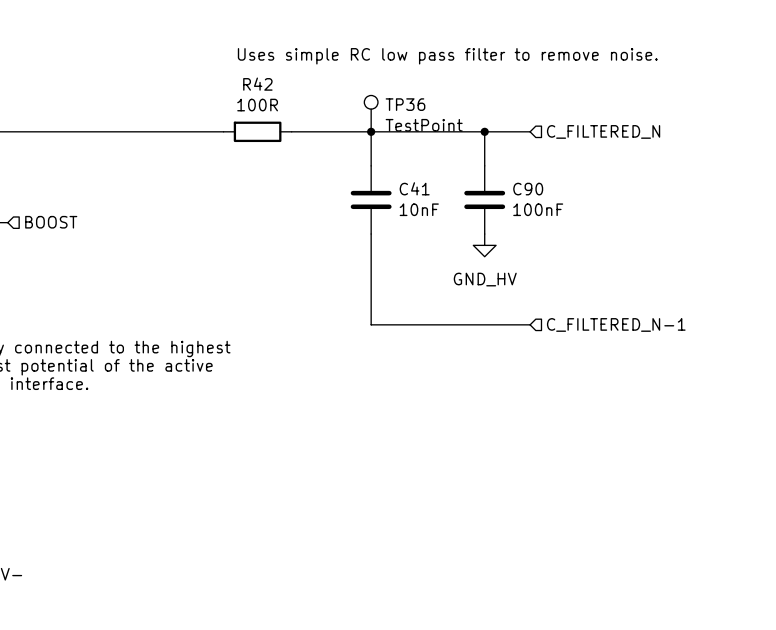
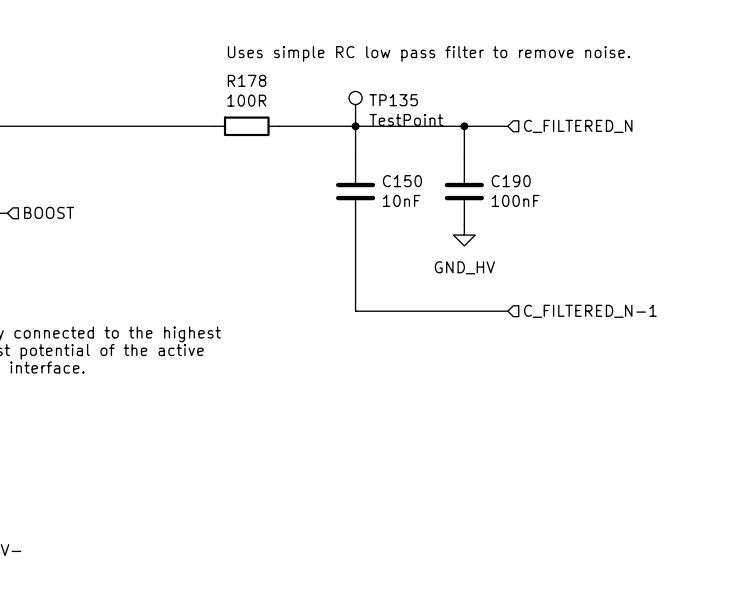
R42 name: R42 (257, 84) -> R178 (247, 80)
TP36 name: TP36 (405, 104) -> TP135 (393, 100)
C41 name: C41 (414, 188) -> C150 (402, 181)
C90 name: C90 (528, 189) -> C190 (511, 181)

